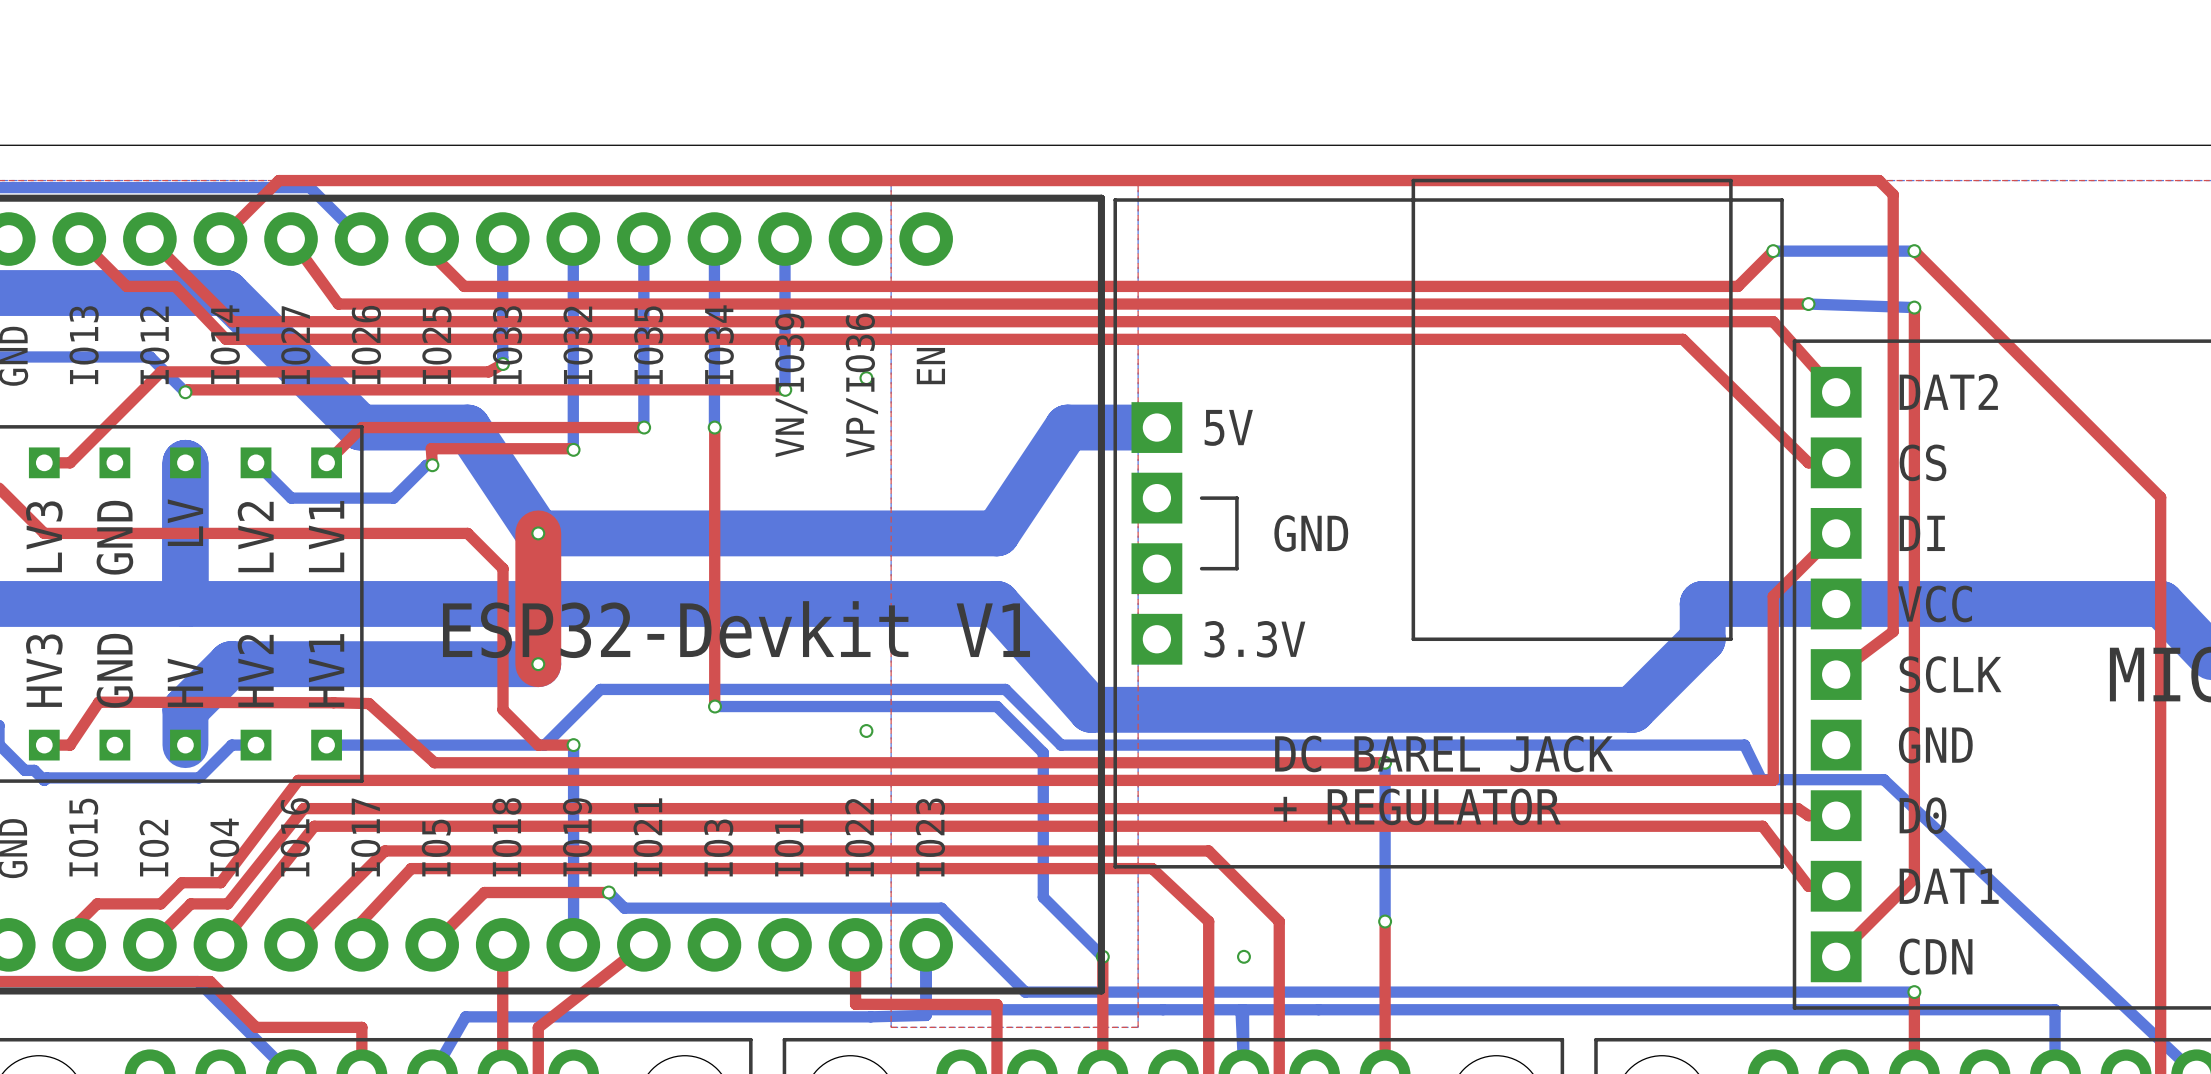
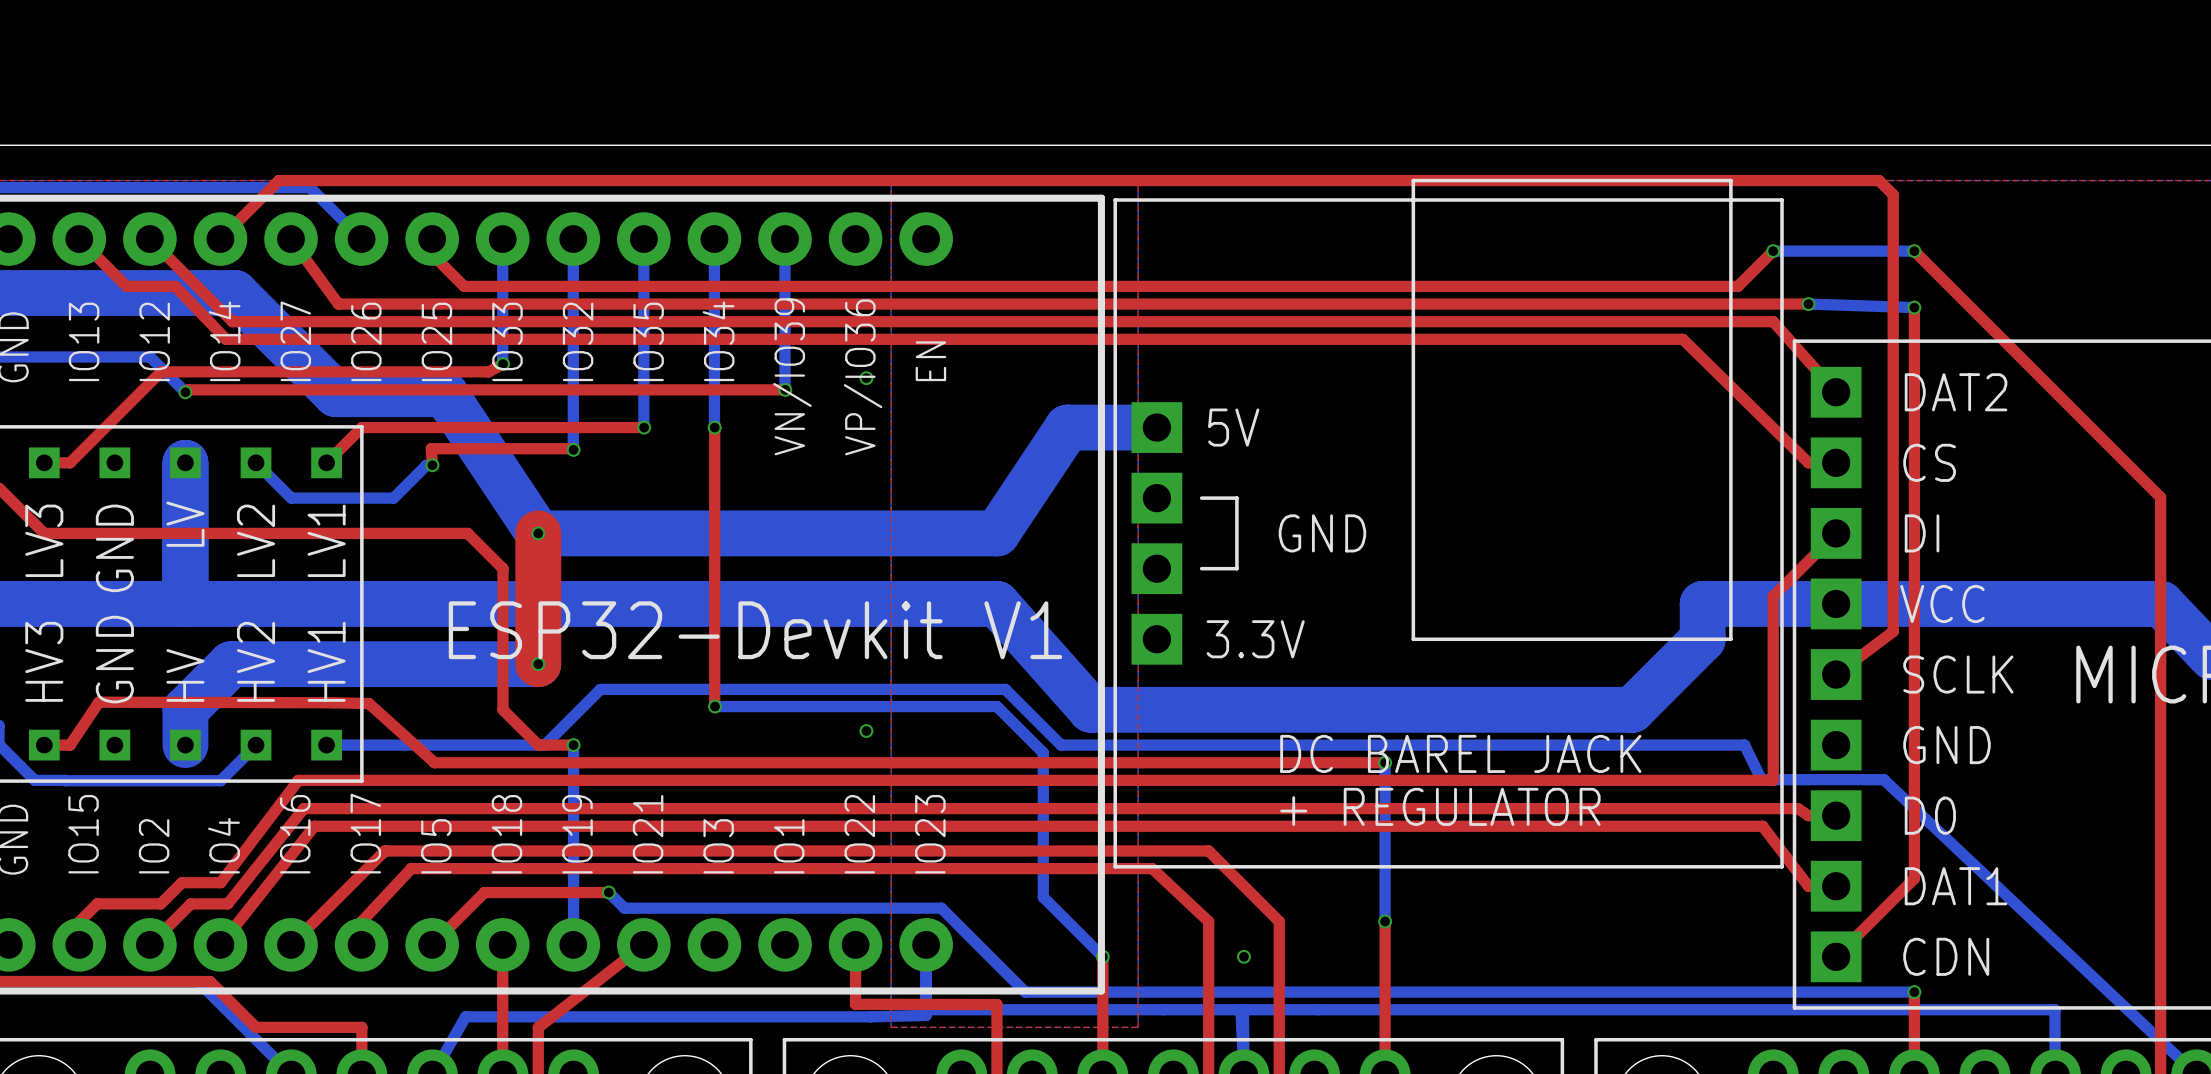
bottom track: (225, 293) (360, 427) (467, 427) -> (225, 293) (234, 293) (336, 394) (445, 394) (467, 427)
bottom track: (256, 745) (231, 745) (199, 777) (46, 777) (44, 780) (34, 770) (24, 770) -> (256, 745) (220, 780) (65, 780)
bottom track: none -> (24, 770) (34, 780) (65, 780)

